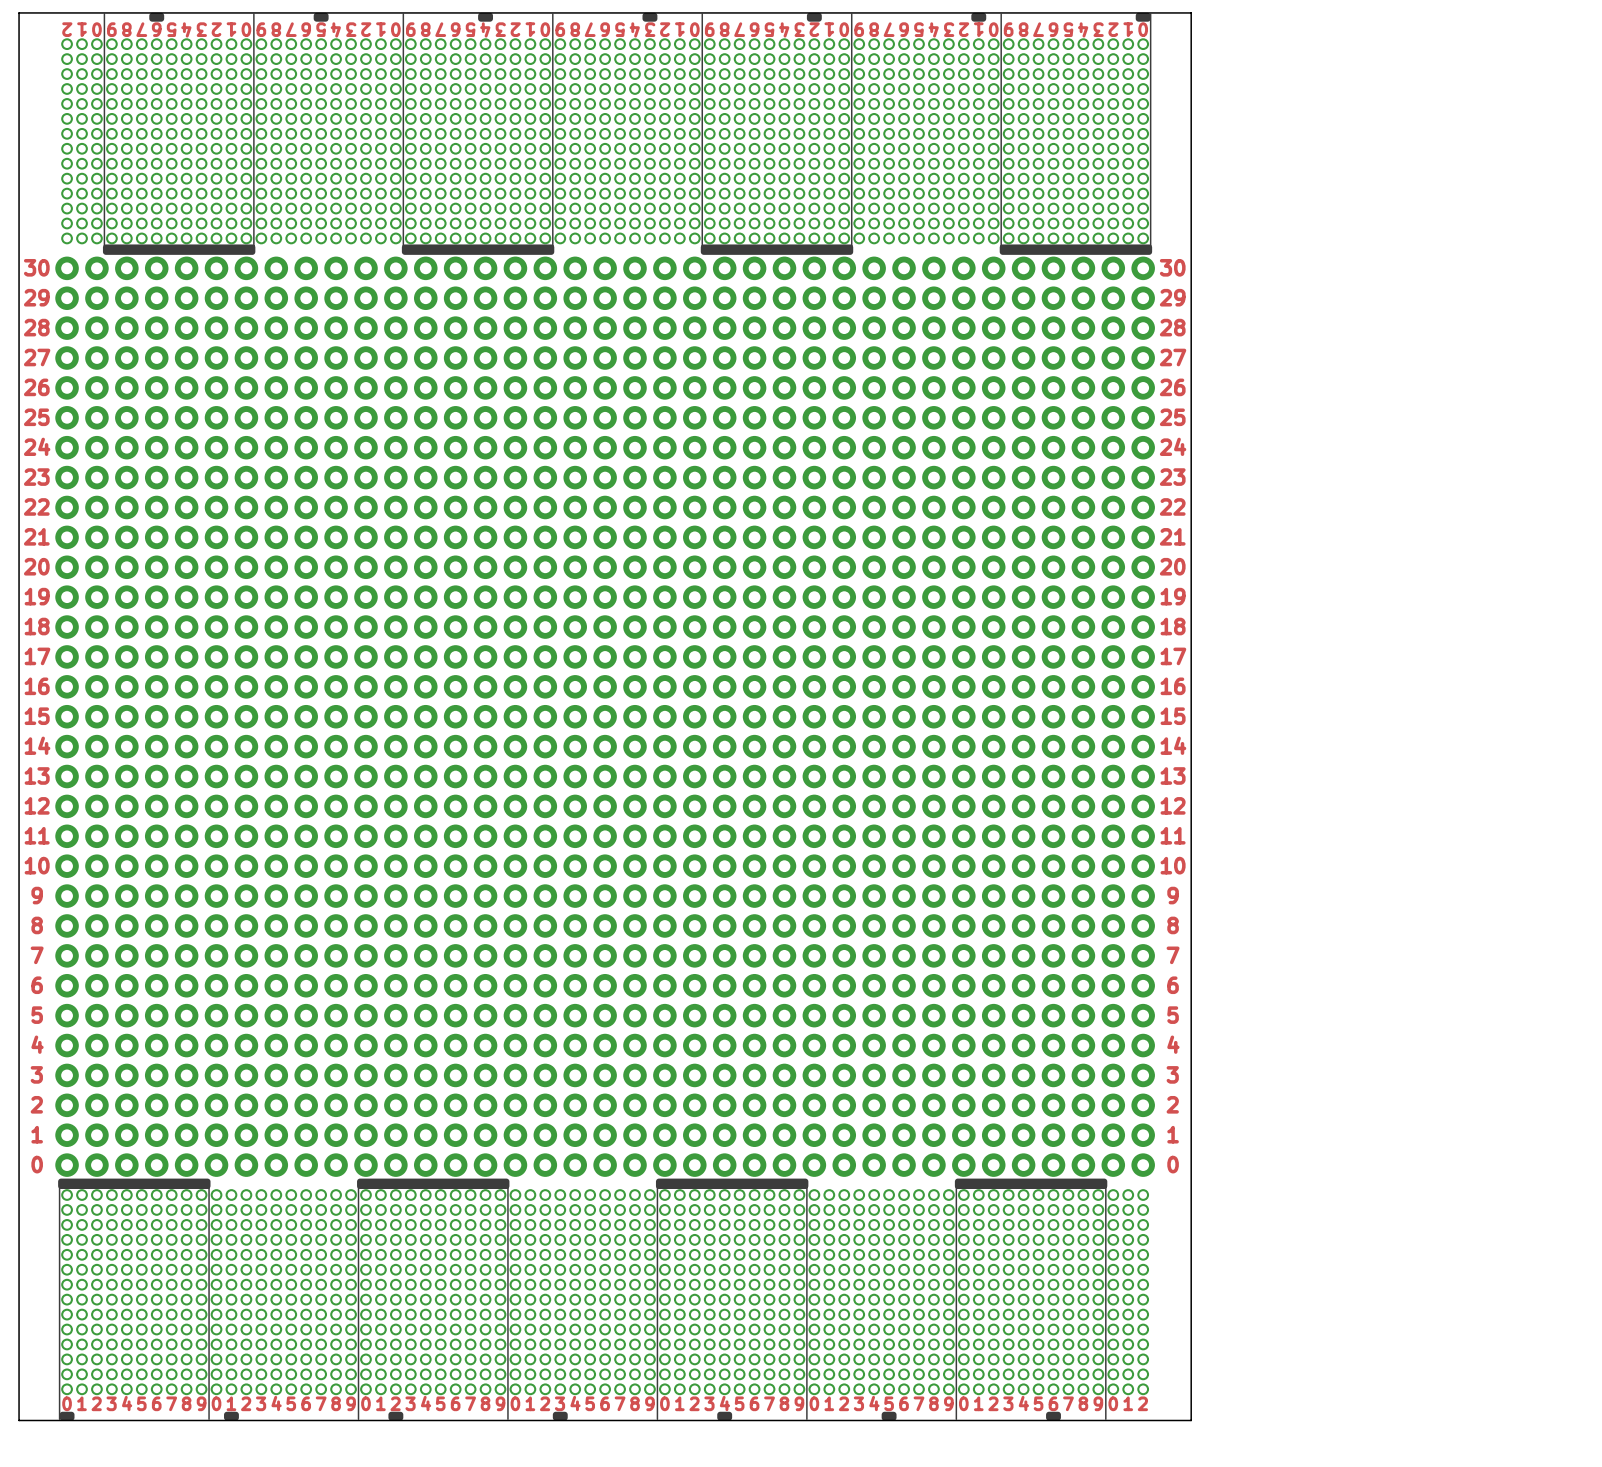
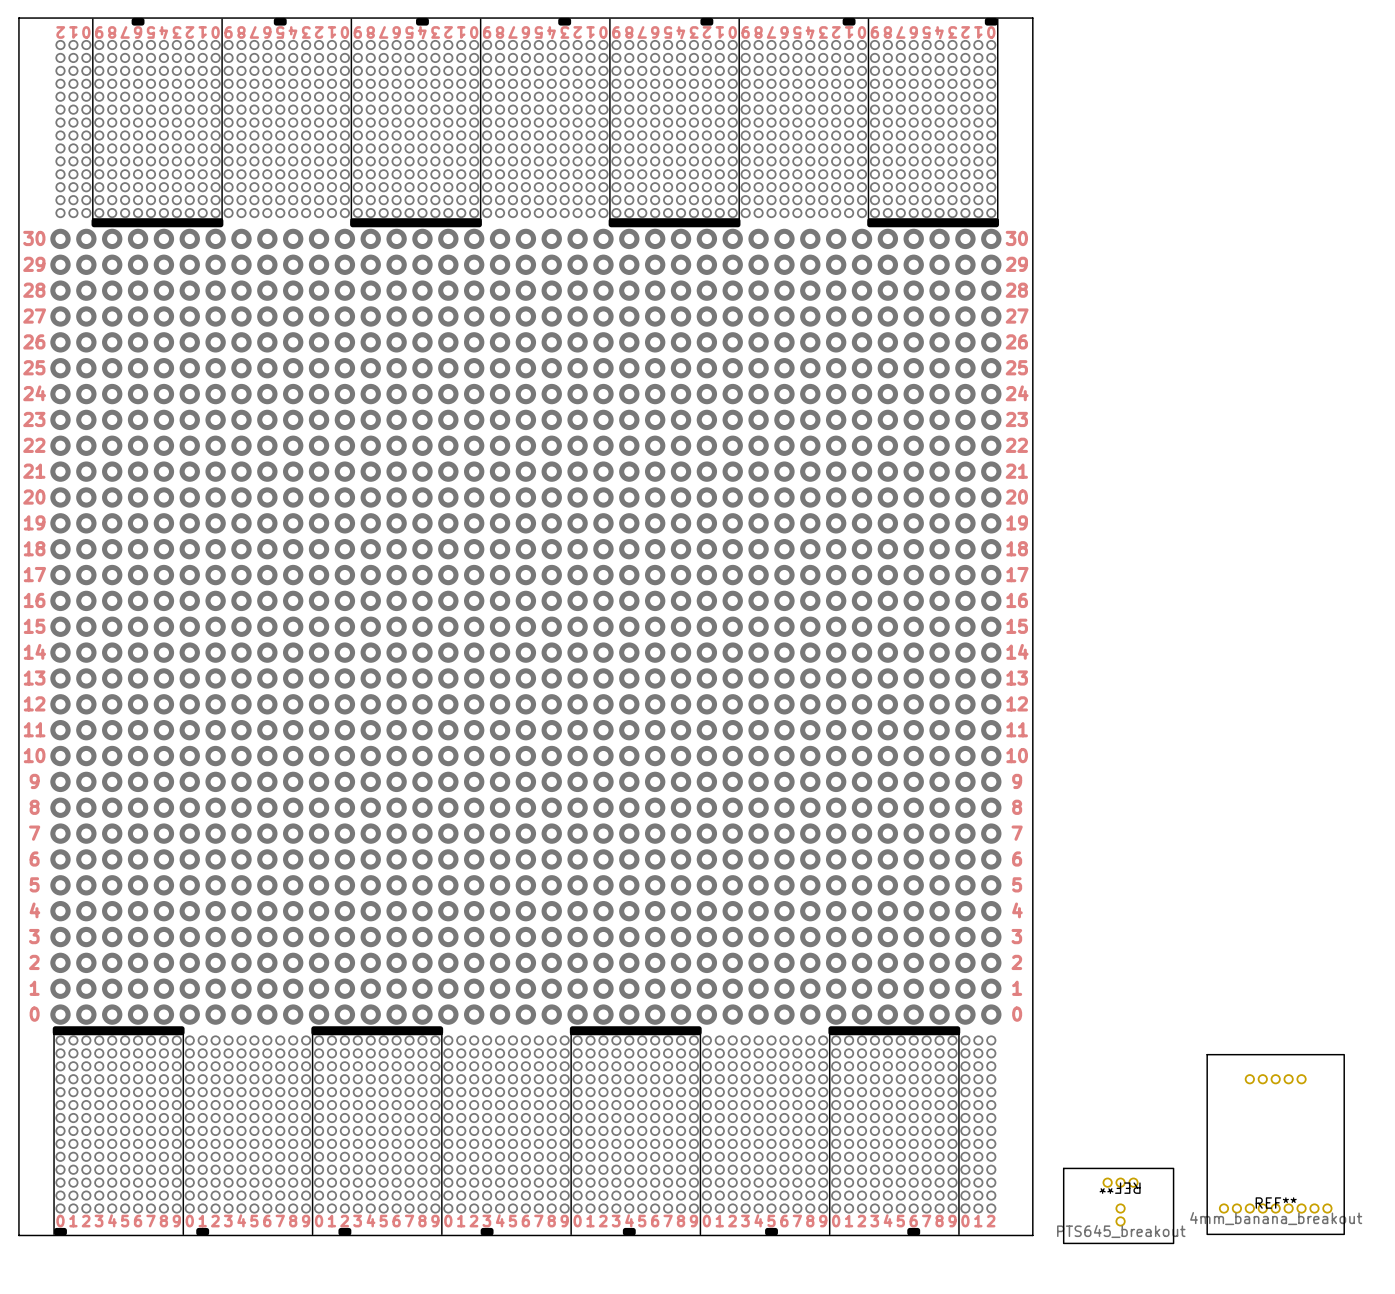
REF**: none -> 4mm_banana_breakout (1275, 1144)
REF**: none -> PTS645_breakout (1118, 1205)

